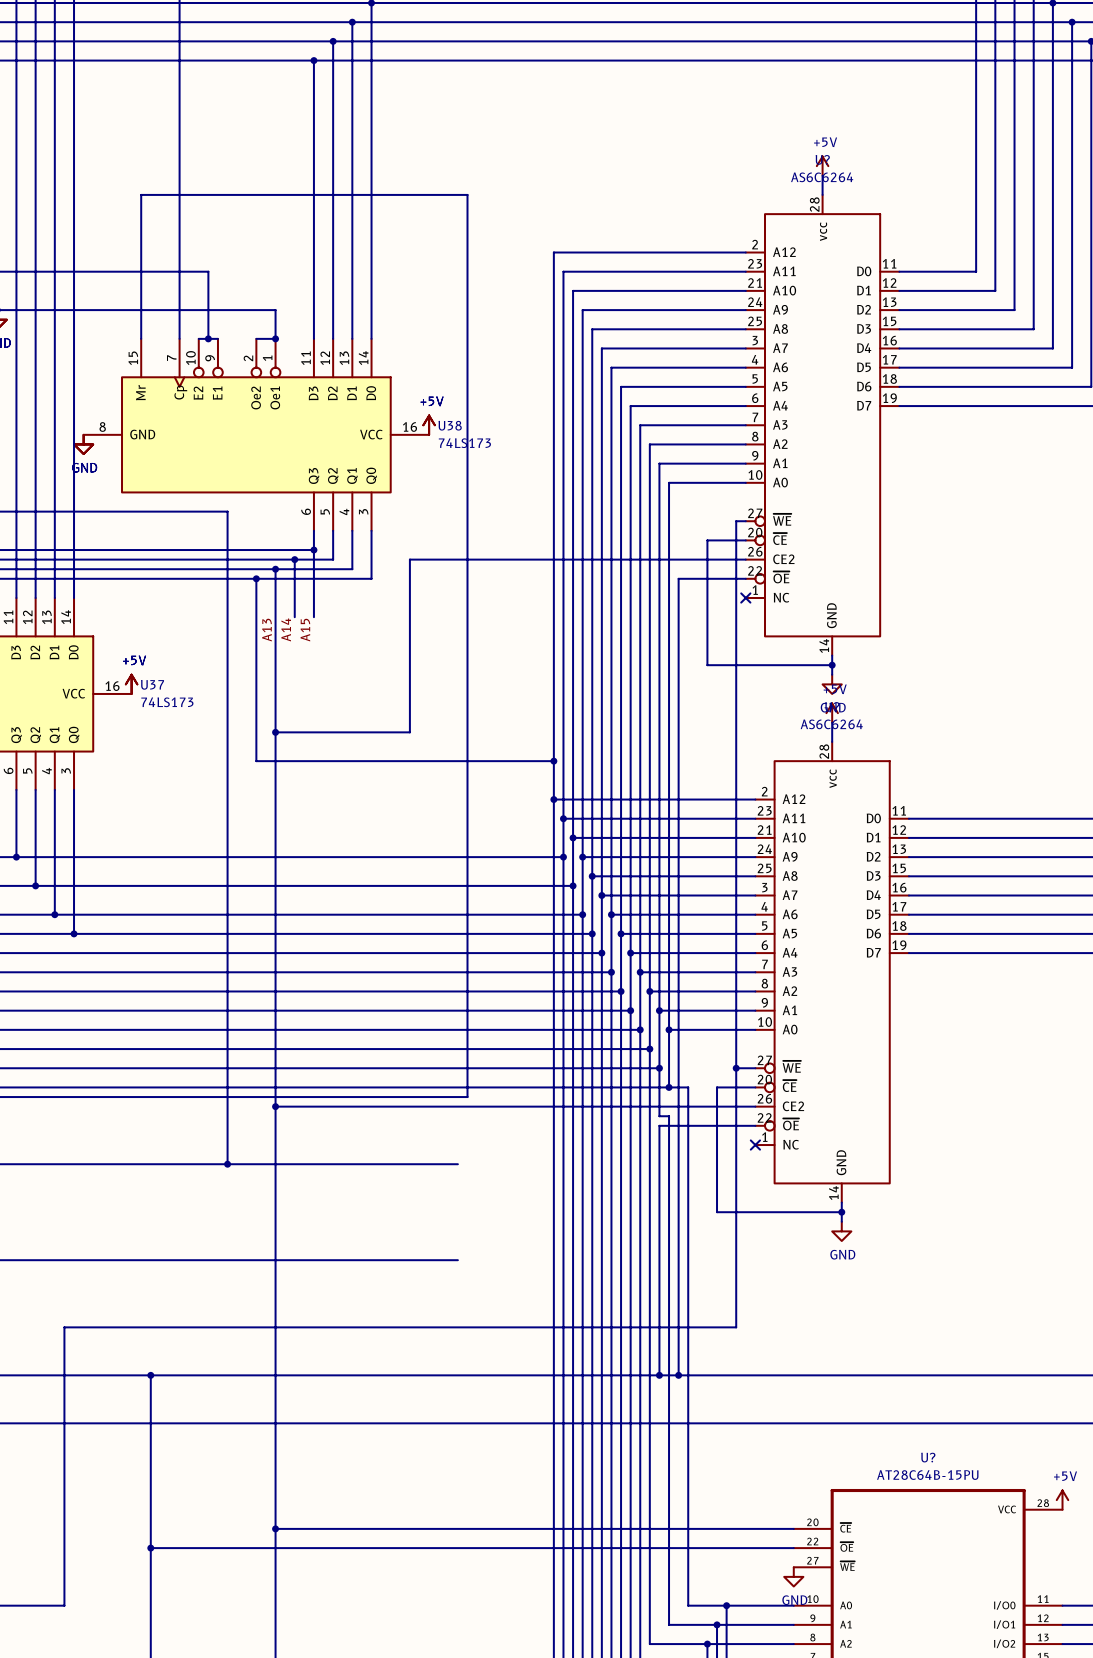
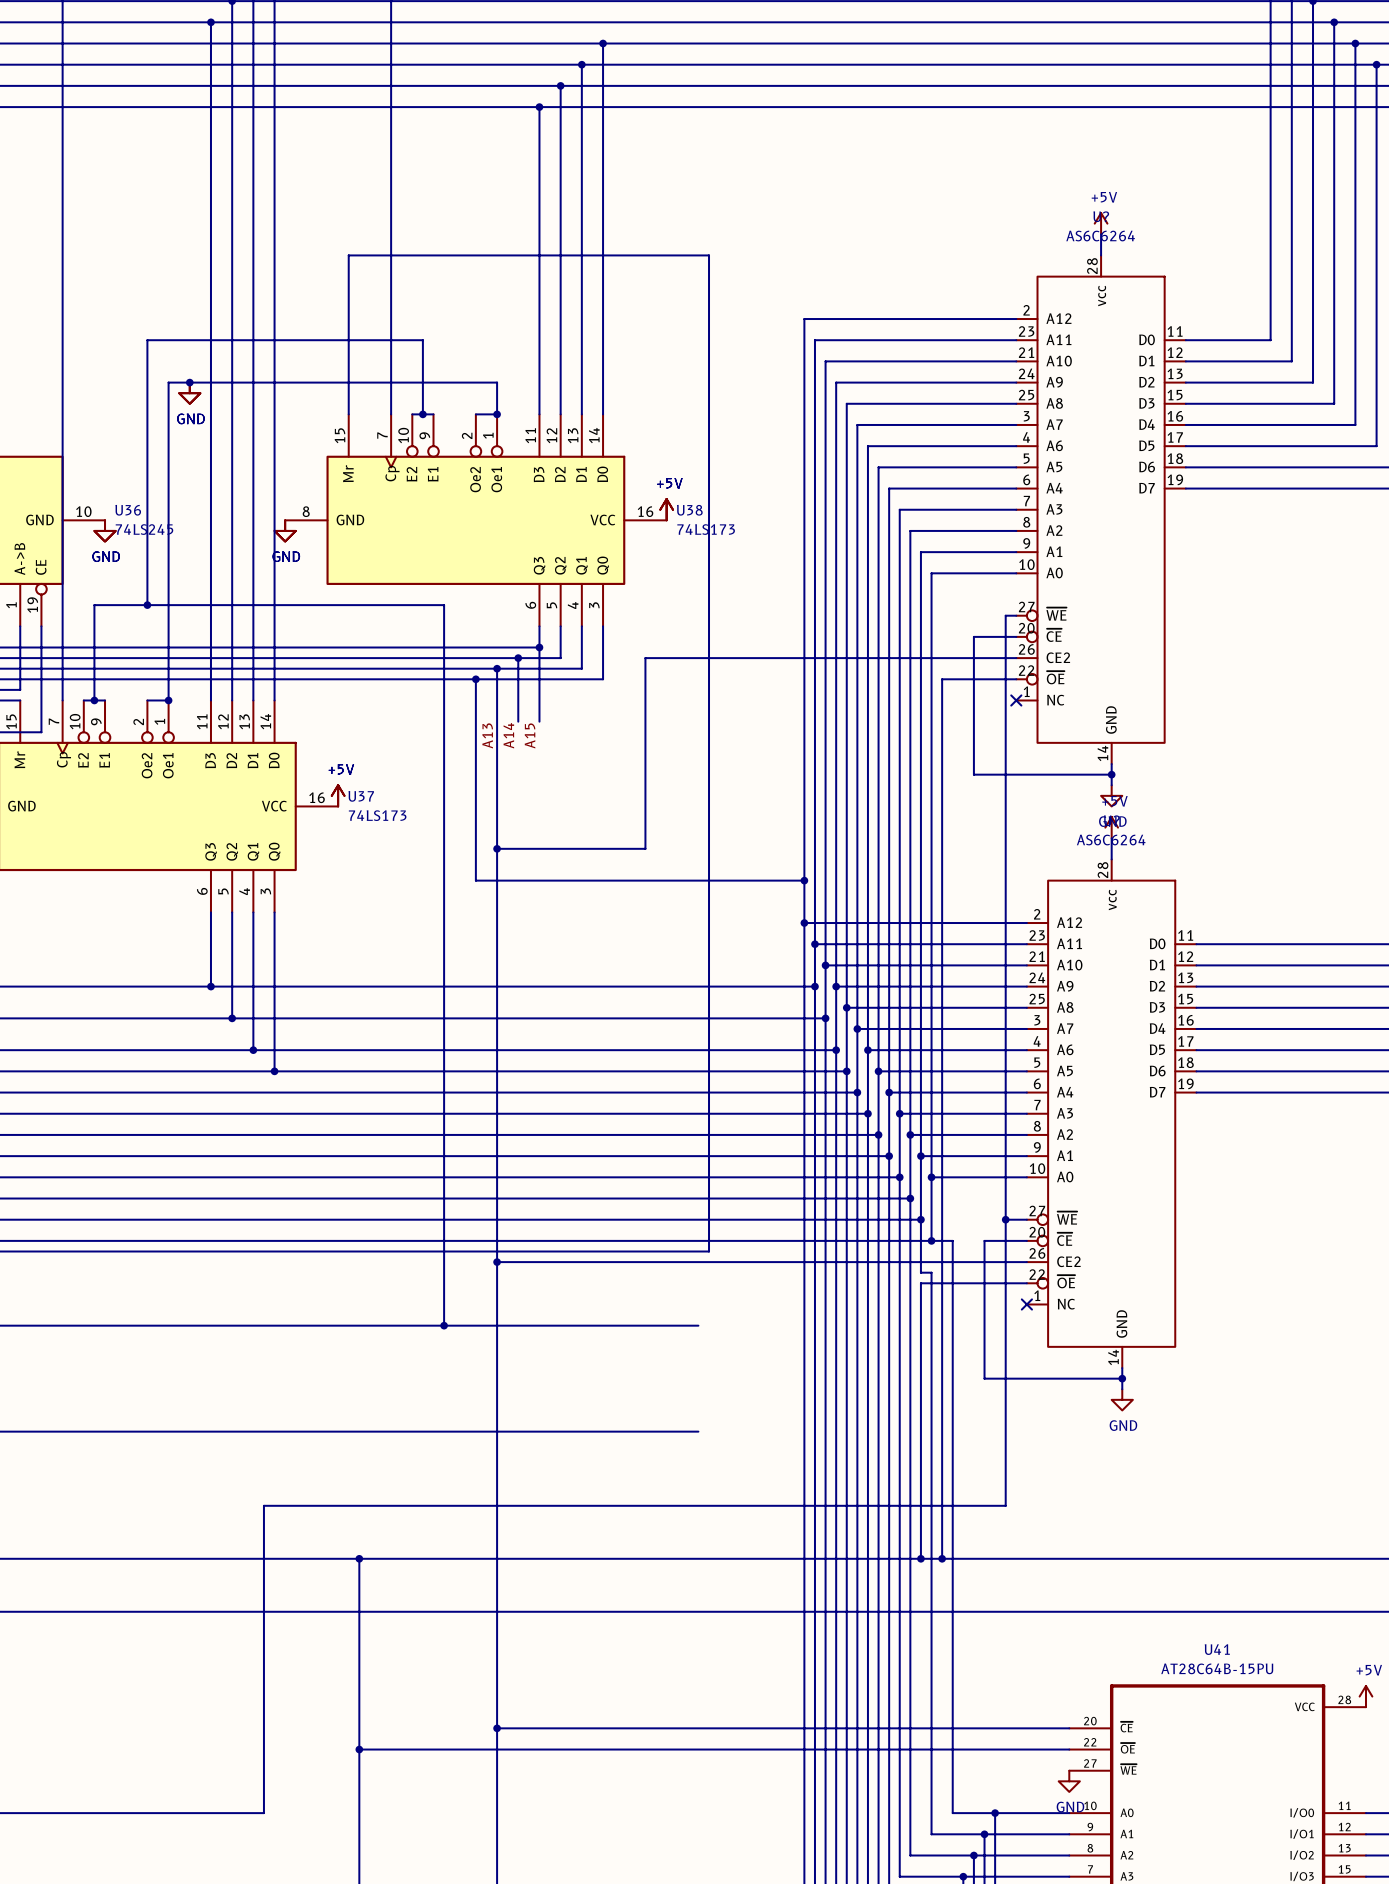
U? name: U? (928, 1457) -> U41 (1217, 1649)

